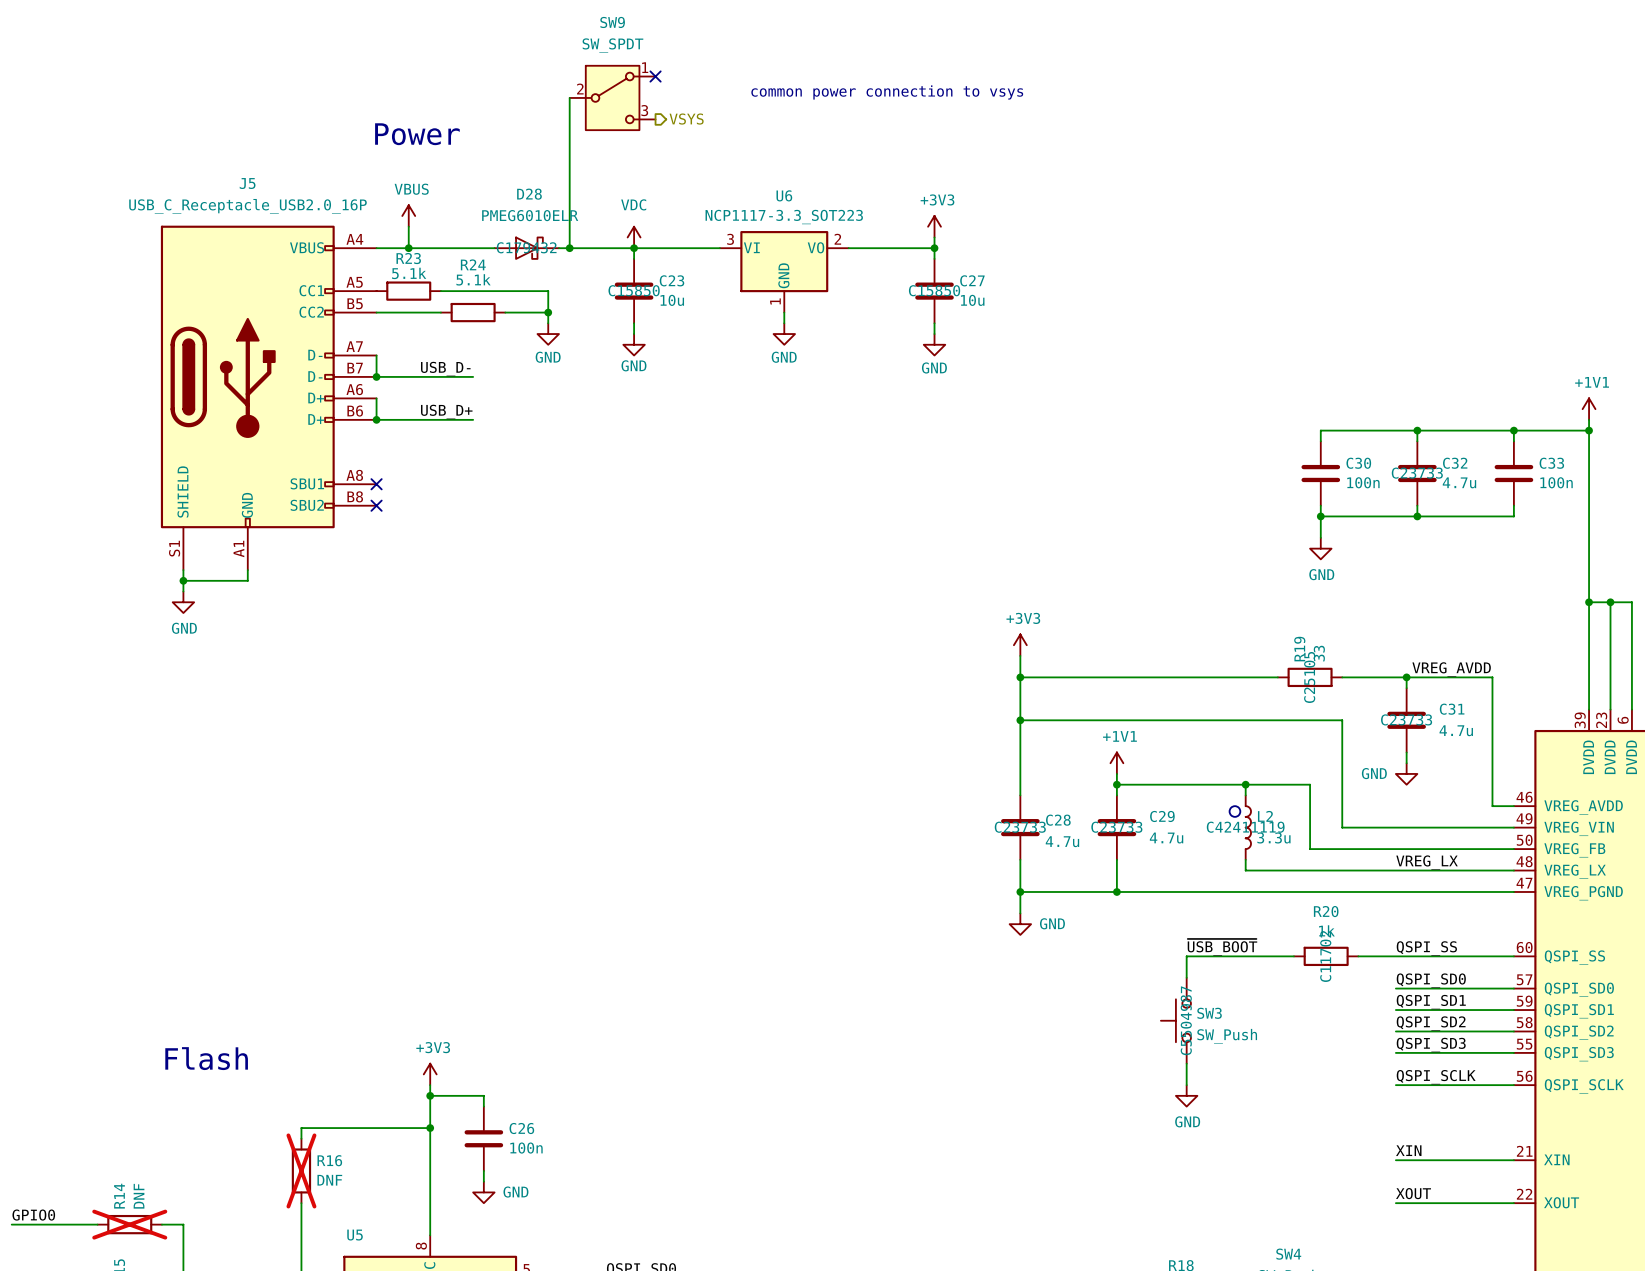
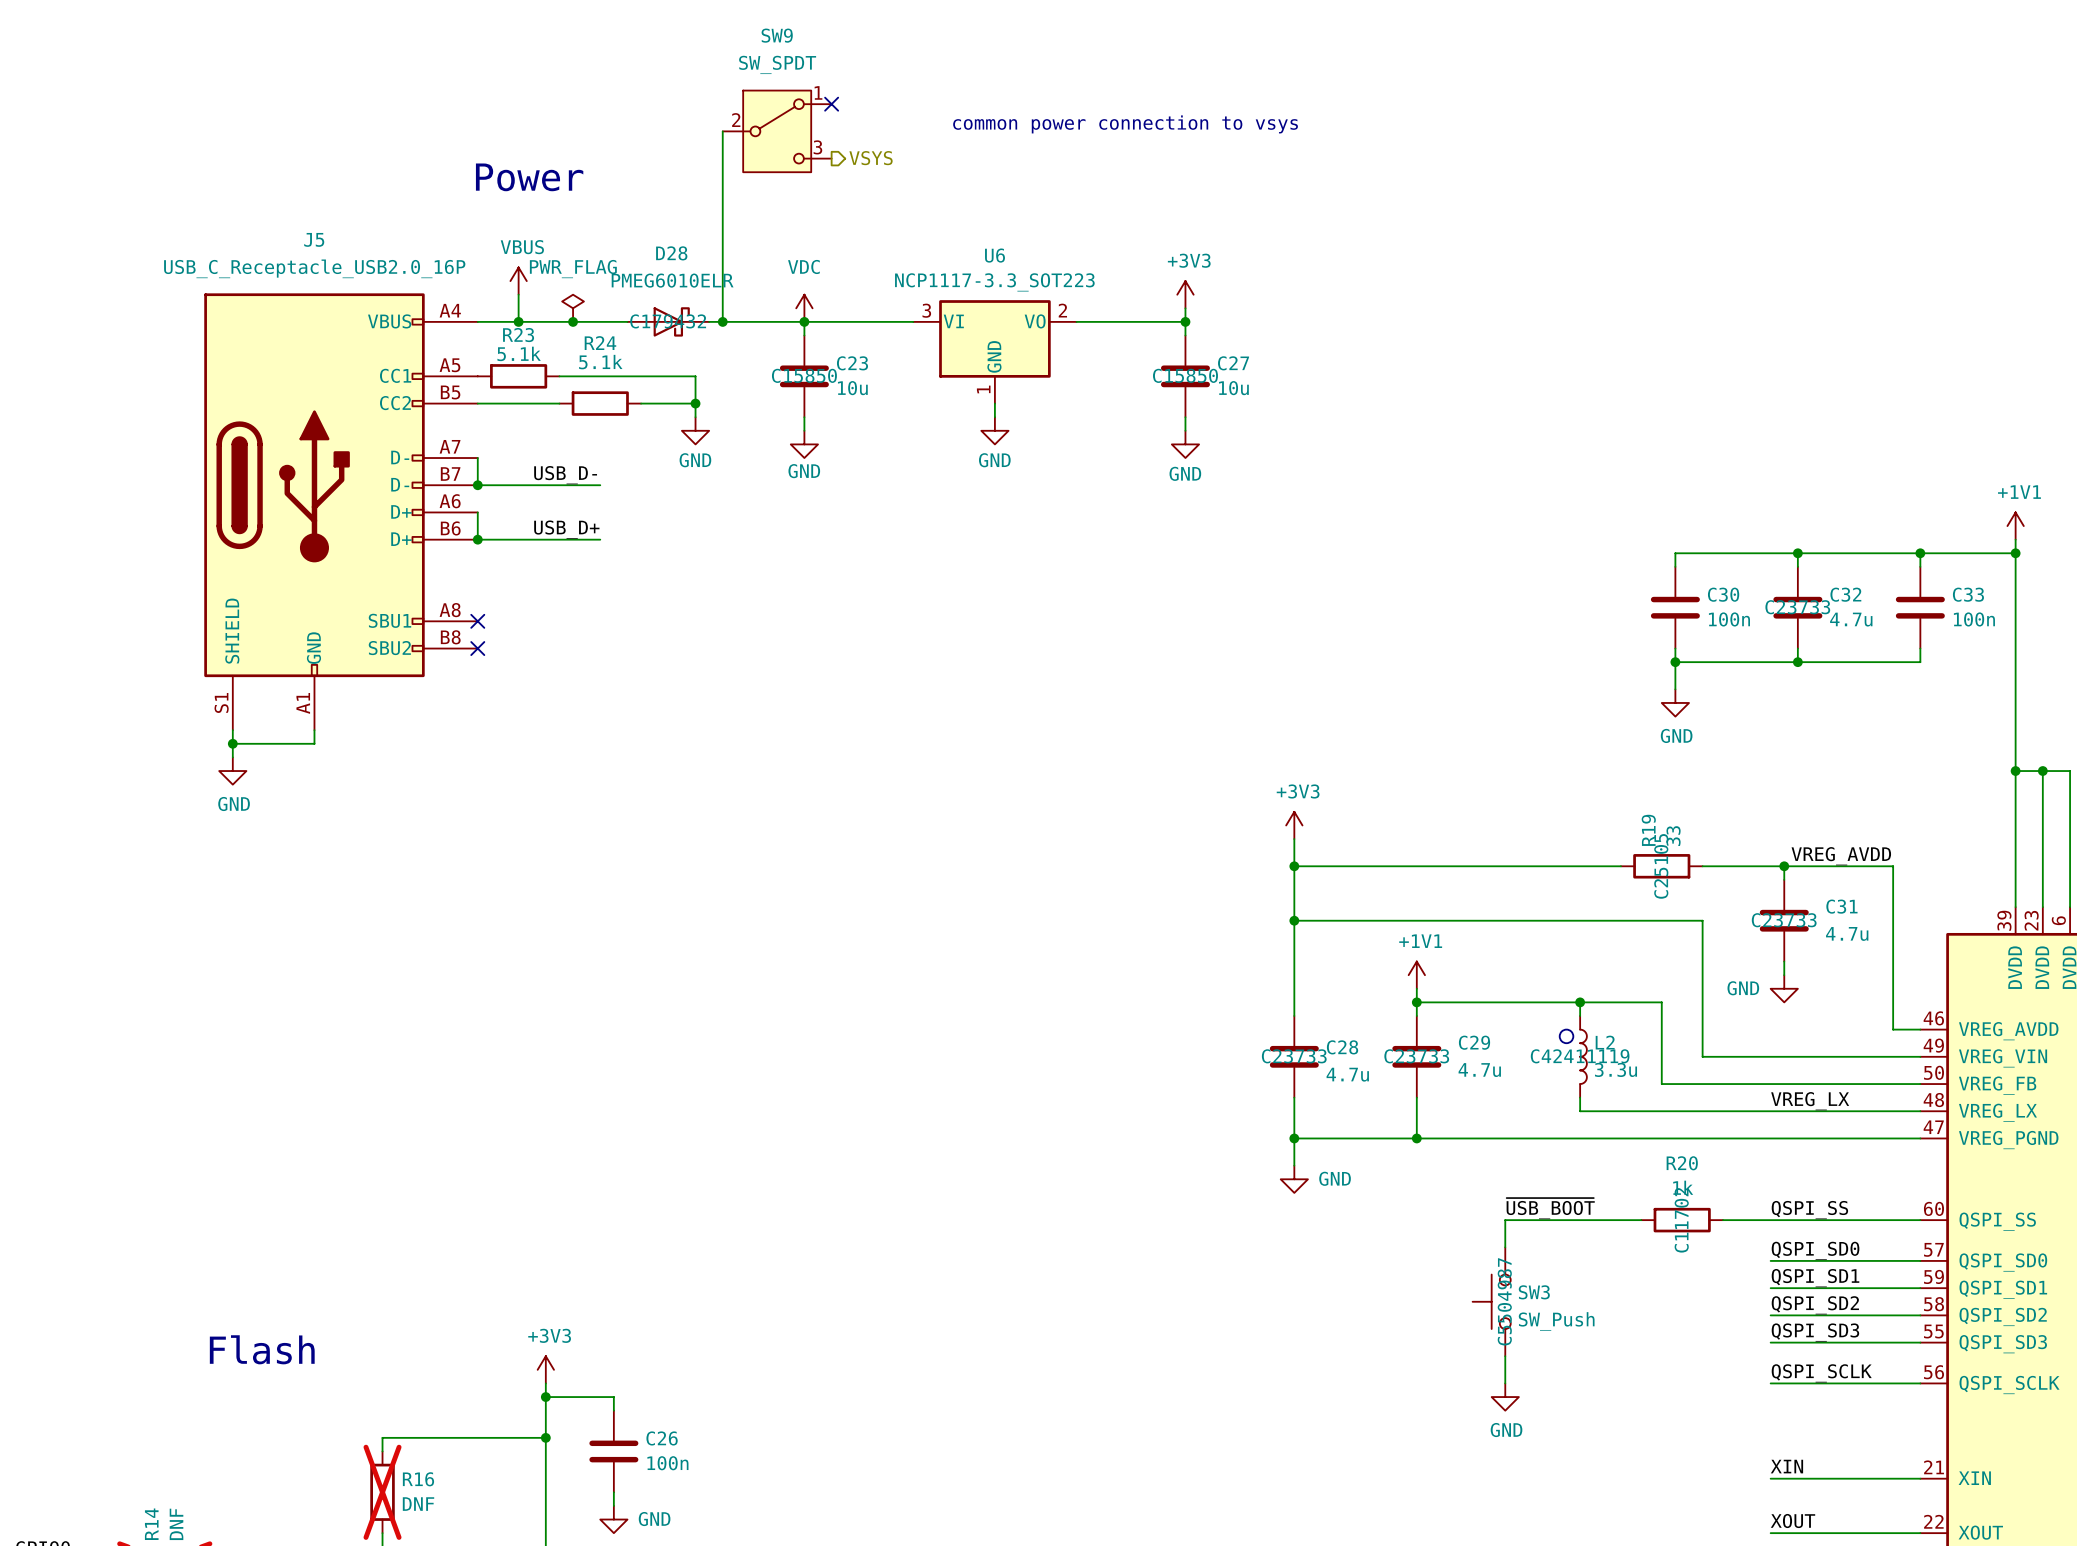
power symbol: none -> PWR_FLAG (573, 308)
junction: none -> (573, 321)

